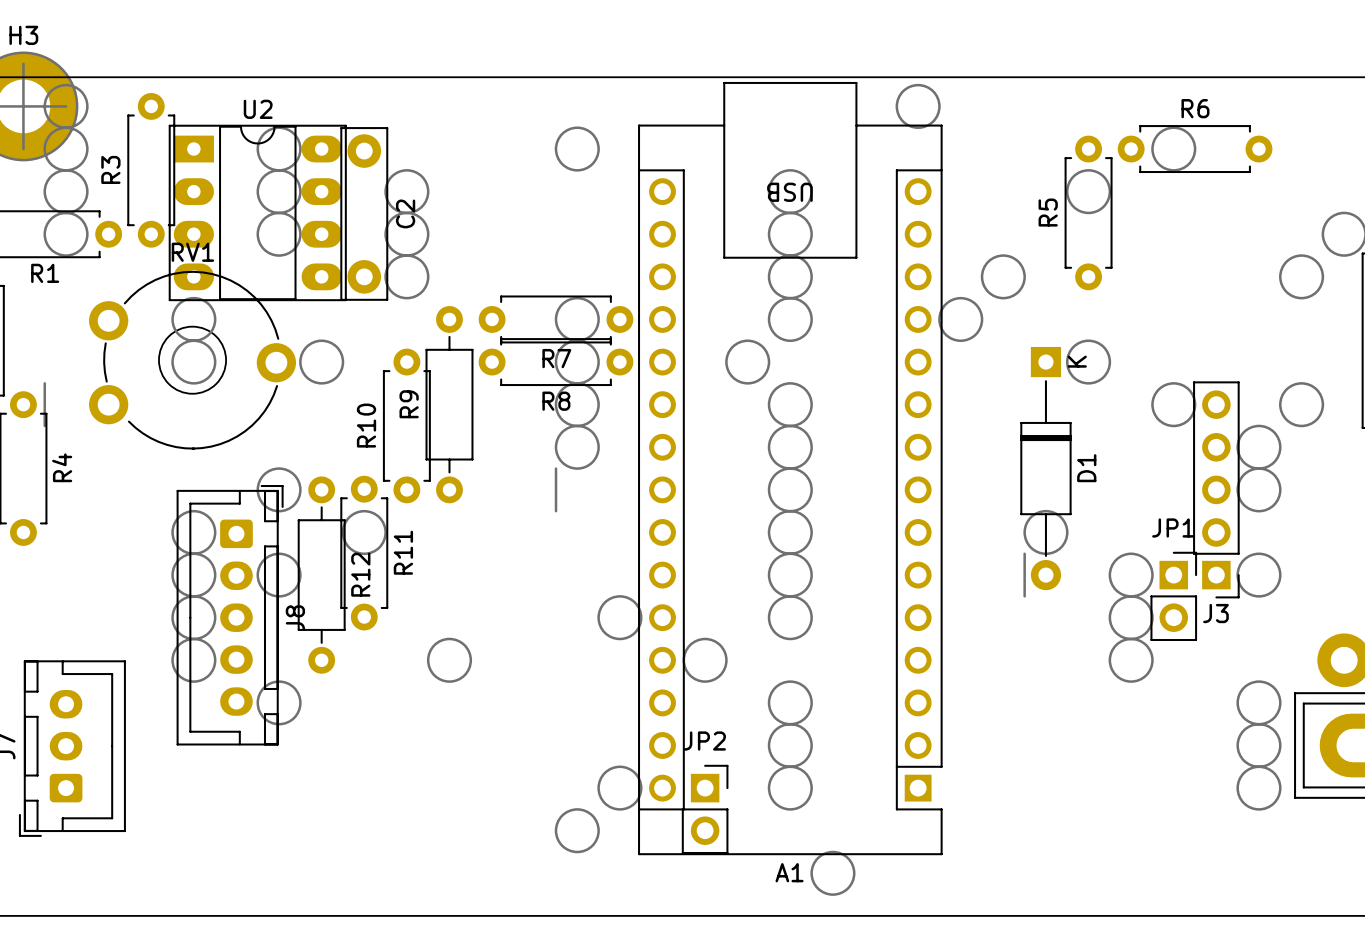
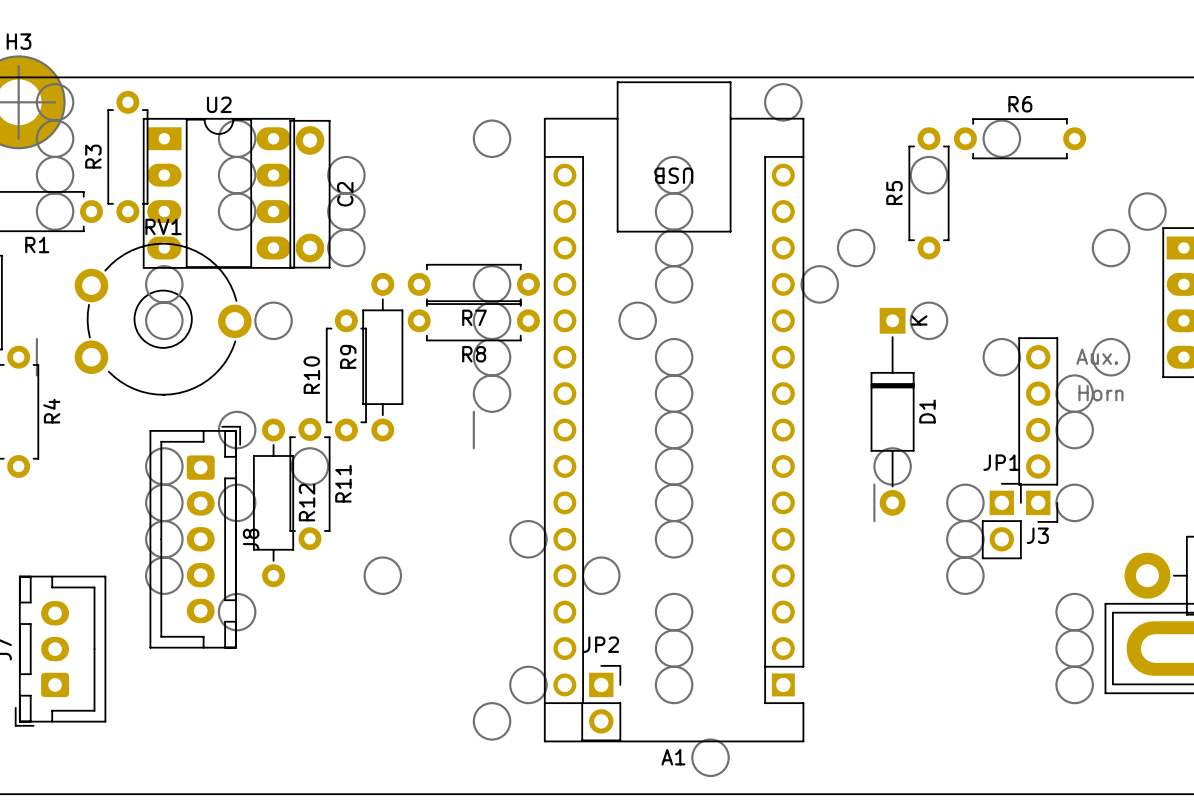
text: none -> Aux. (1097, 356)
text: none -> Horn (1100, 393)

